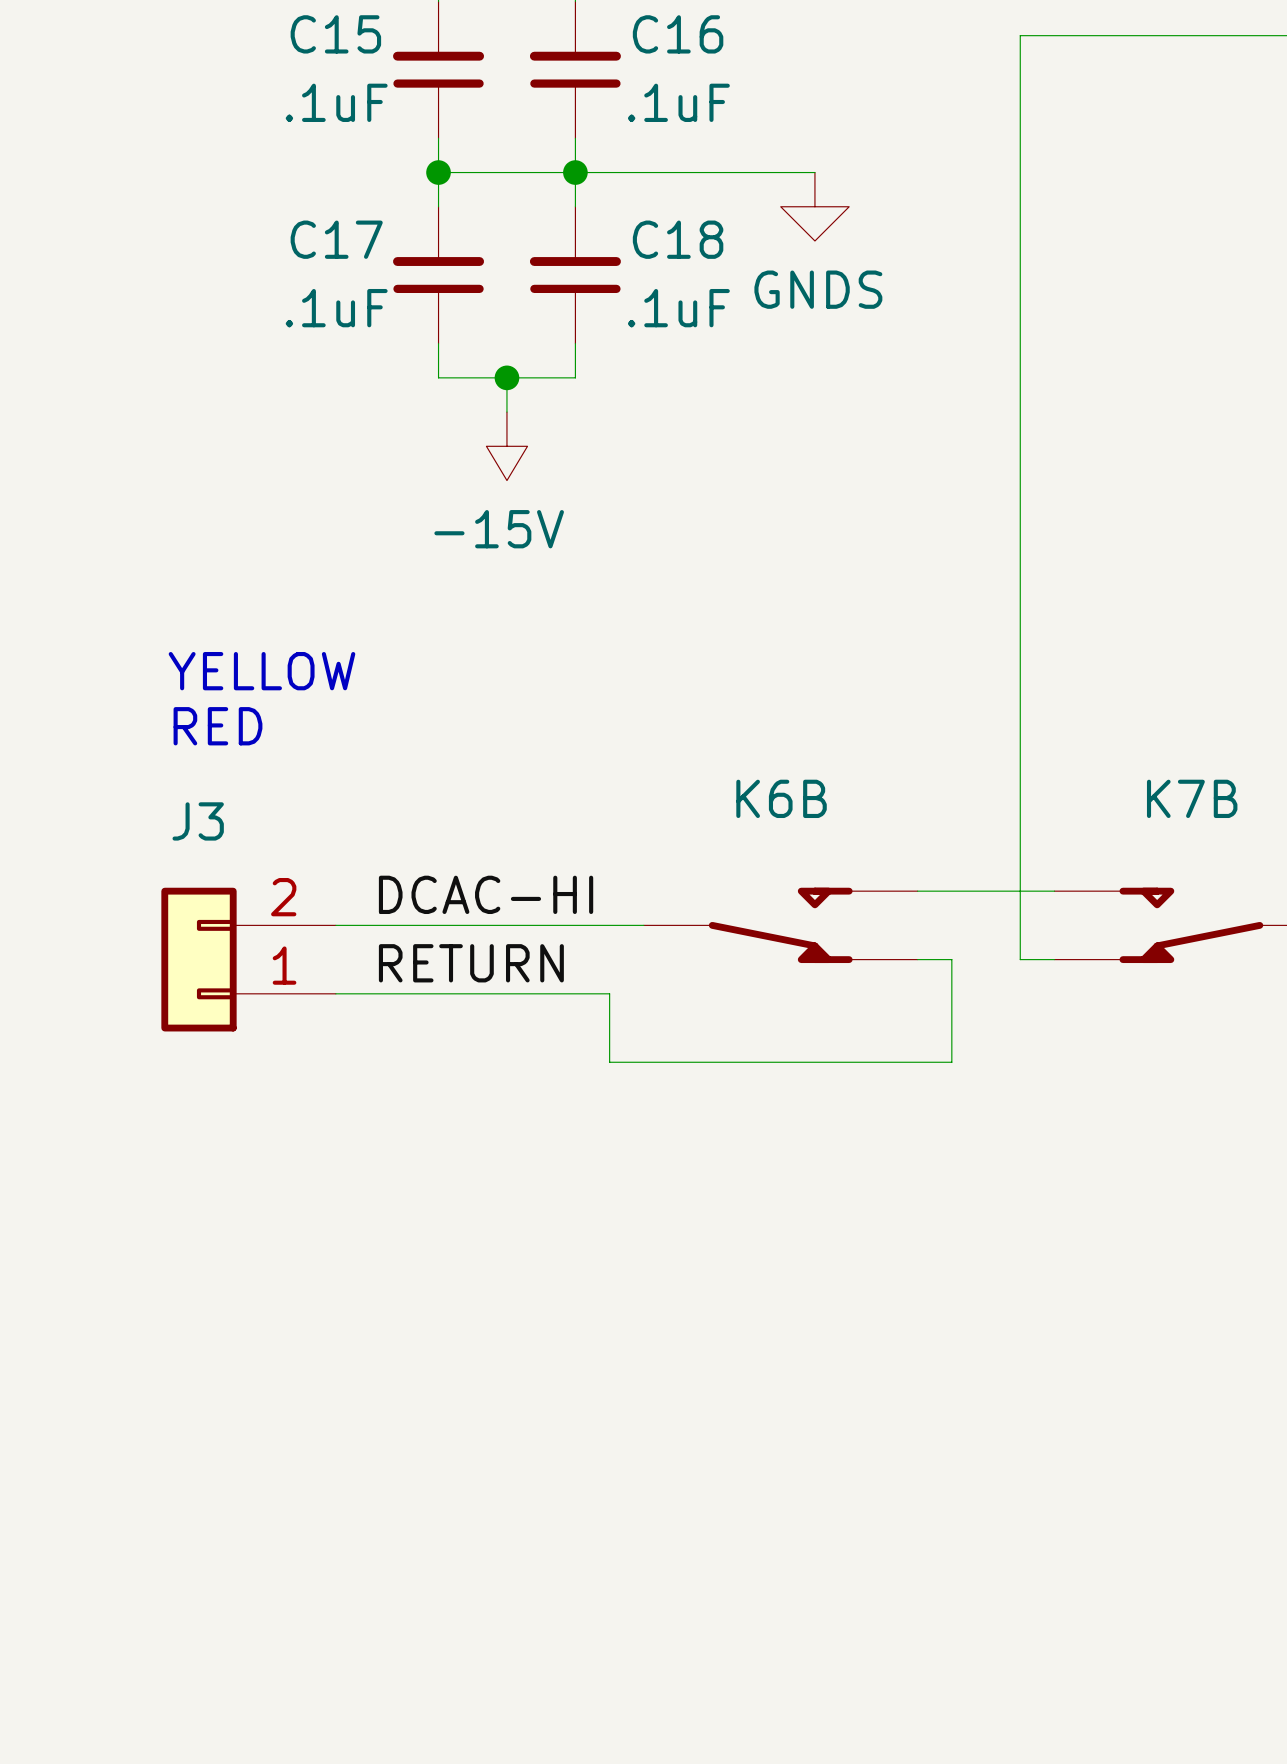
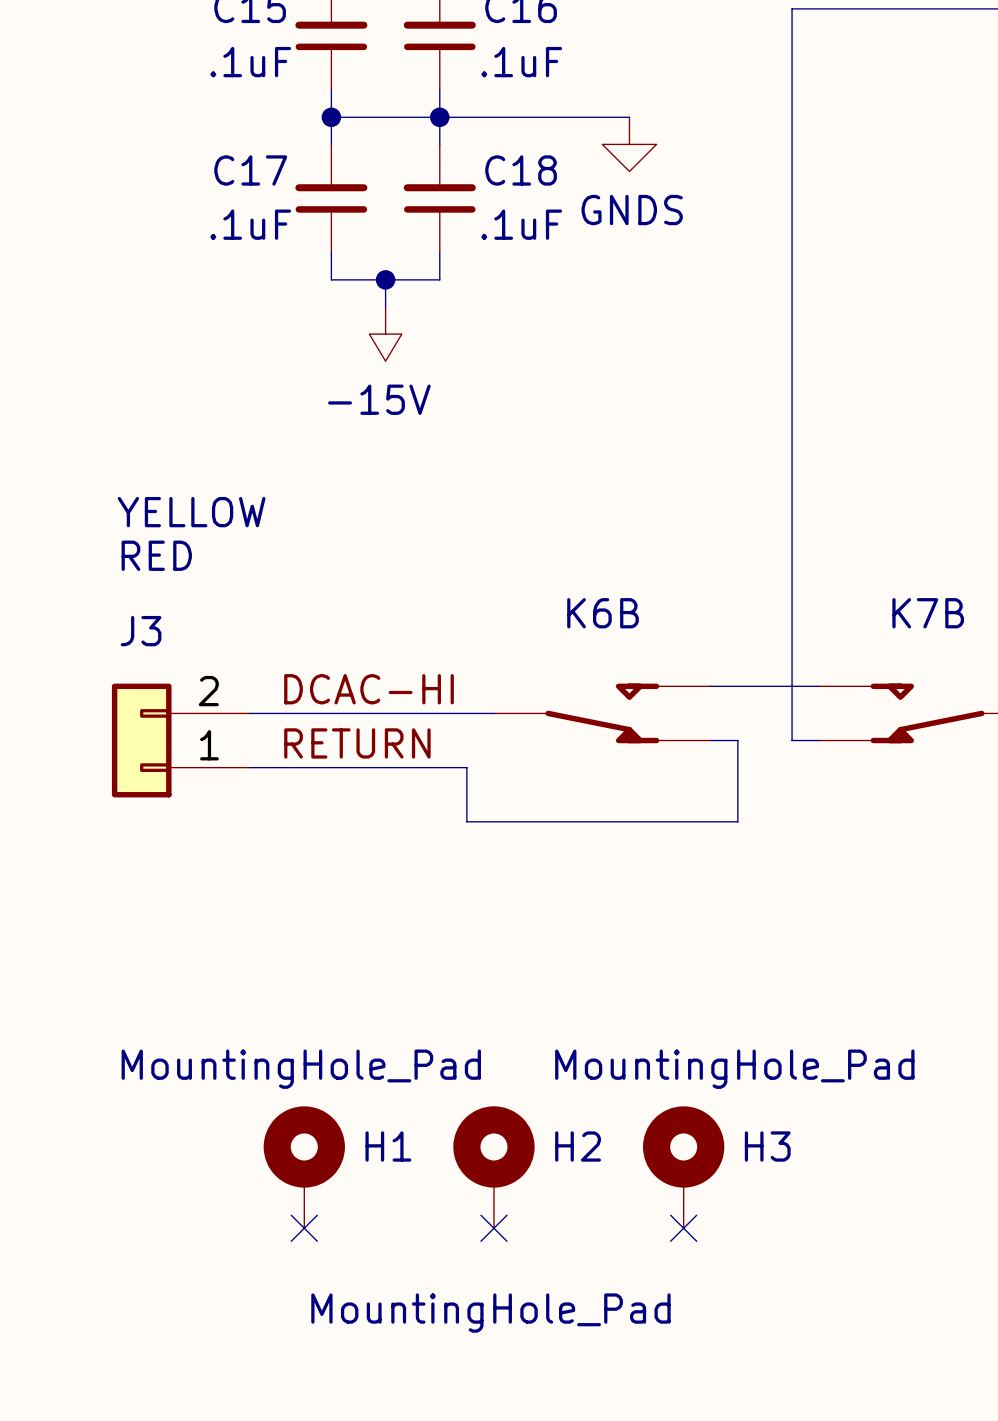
H1: none -> MountingHole_Pad (304, 1167)
H2: none -> MountingHole_Pad (493, 1167)
H3: none -> MountingHole_Pad (683, 1167)
no-connect mark: none -> (304, 1228)
no-connect mark: none -> (493, 1228)
no-connect mark: none -> (683, 1228)

